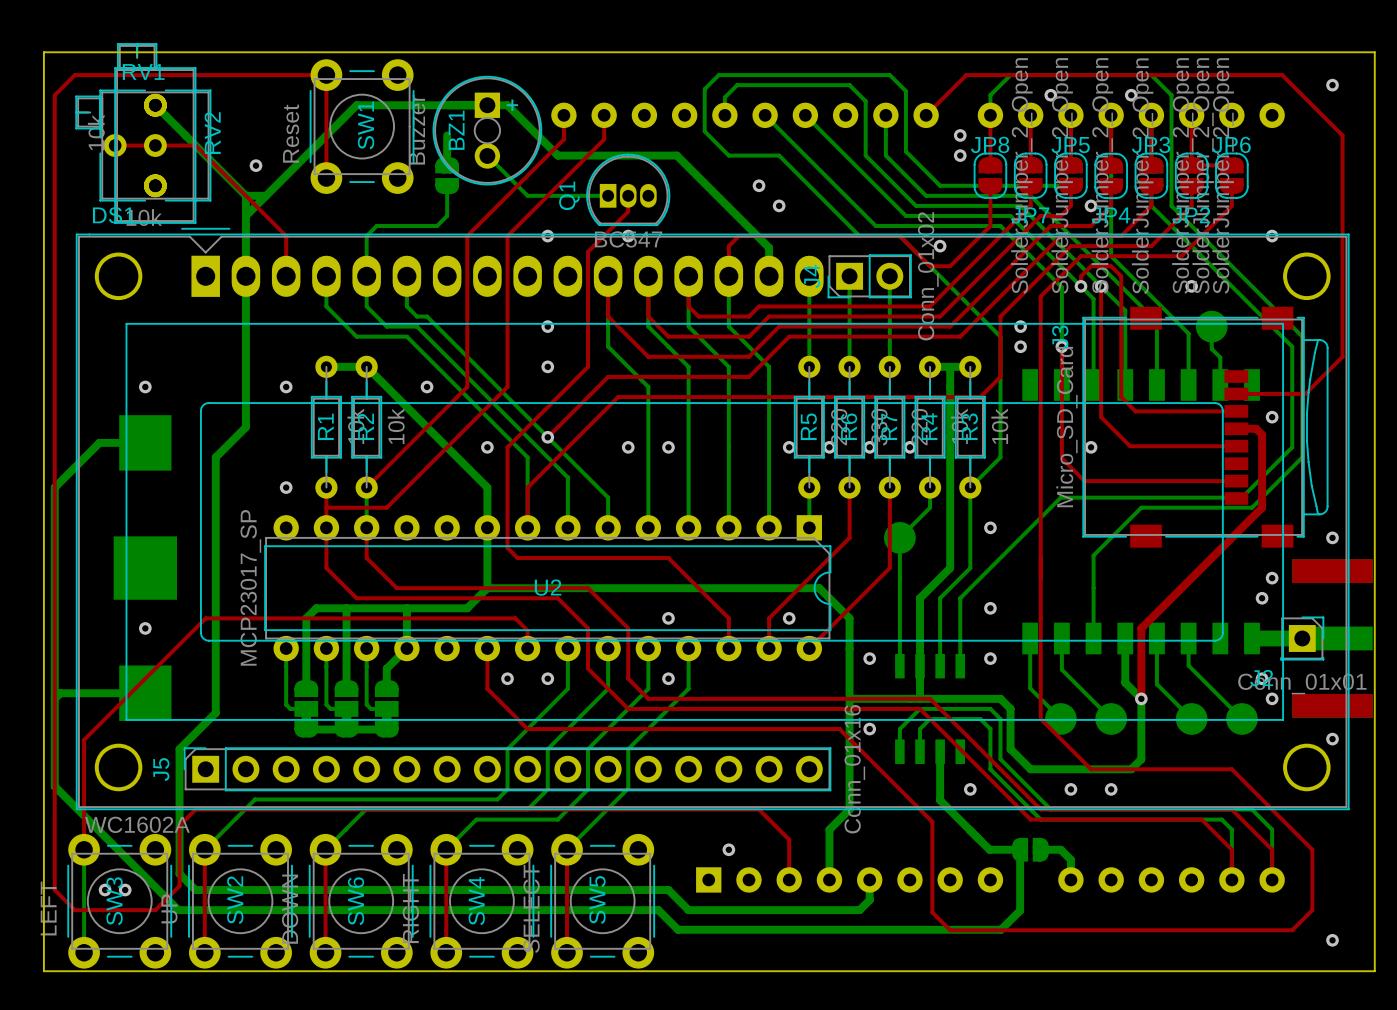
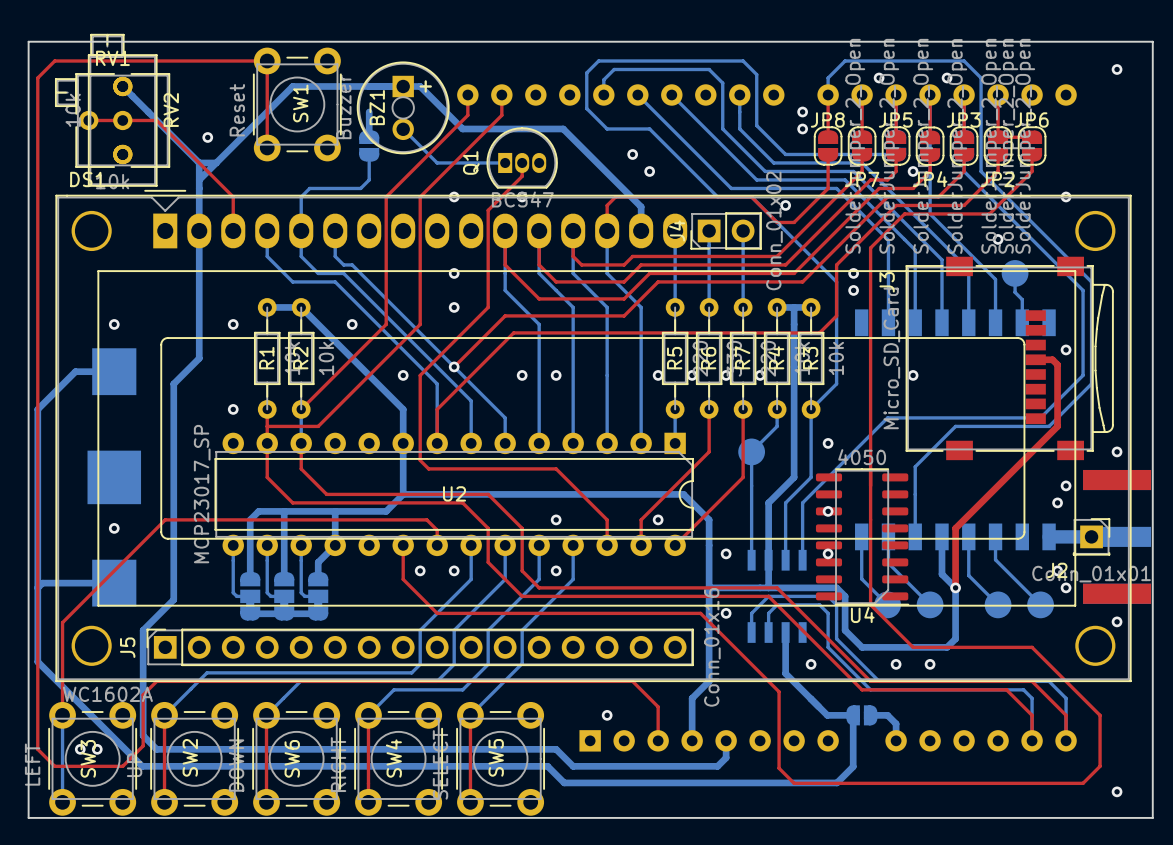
top track: (926, 115) (966, 75) (1282, 75) (1342, 135) (1342, 356) (1305, 393) (1236, 393) -> none
top track: (1080, 286) (1080, 276) (1091, 266) (1111, 266) (1121, 276) (1121, 397) (1135, 411) (1236, 411) -> none
via: (1080, 286) -> none
top track: (1101, 286) (1101, 417) (1130, 446) (1236, 446) -> none
via: (1101, 286) -> none
top track: (1061, 346) (1061, 458) (1084, 481) (1236, 481) -> none
via: (1061, 346) -> none
U4: none -> 4050 (862, 536)

